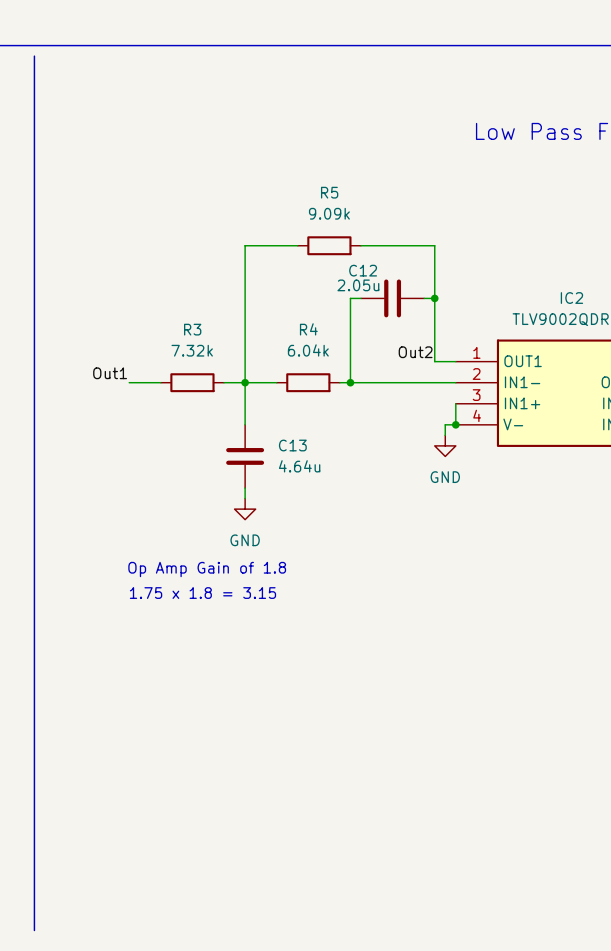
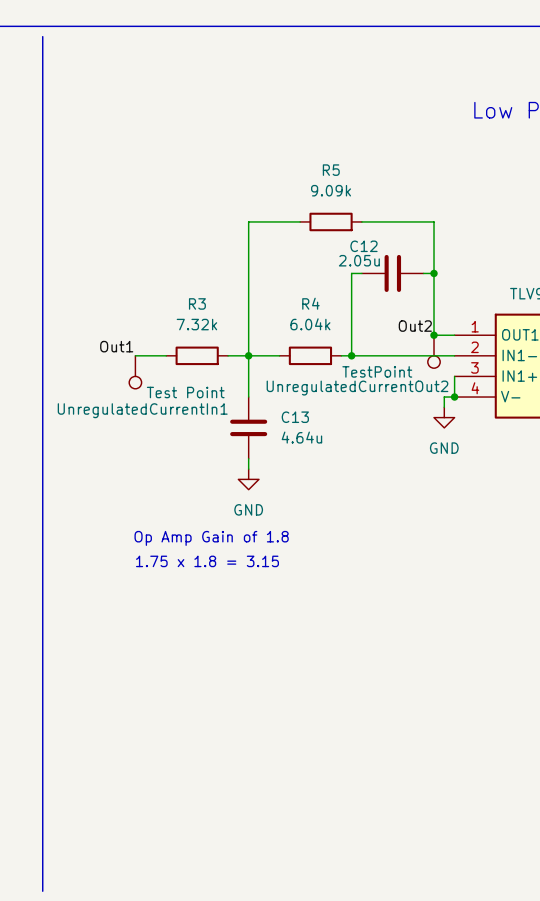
junction: none -> (434, 335)
UnregulatedCurrentOut2: none -> TestPoint (434, 351)
UnregulatedCurrentIn1: none -> Test Point (135, 372)

